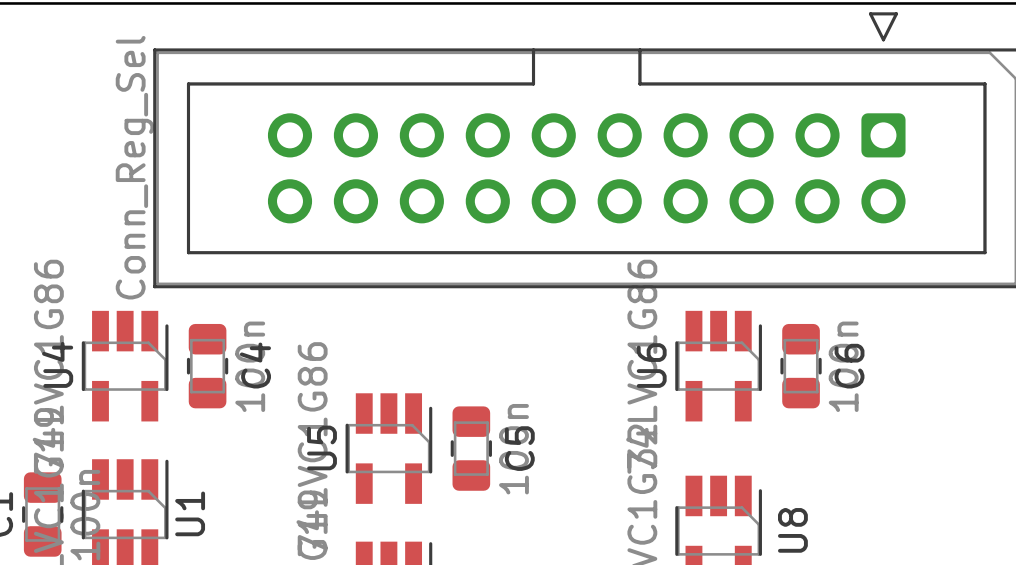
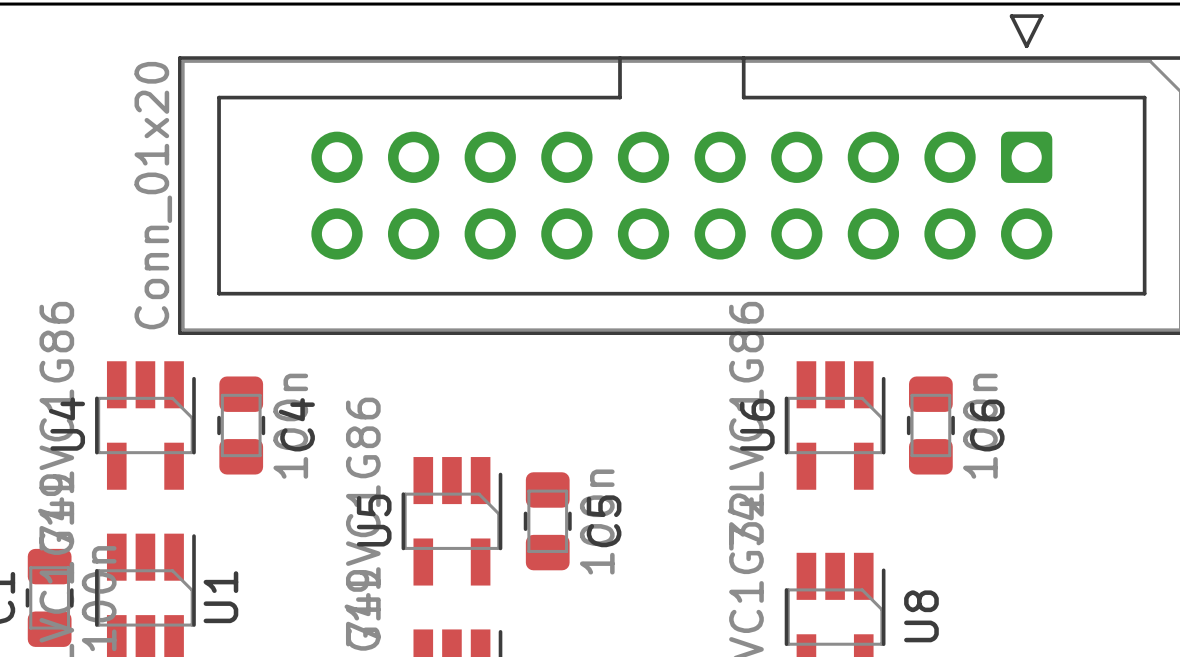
part value: Conn_Reg_Sel (134, 167) -> Conn_01x20 (153, 195)

